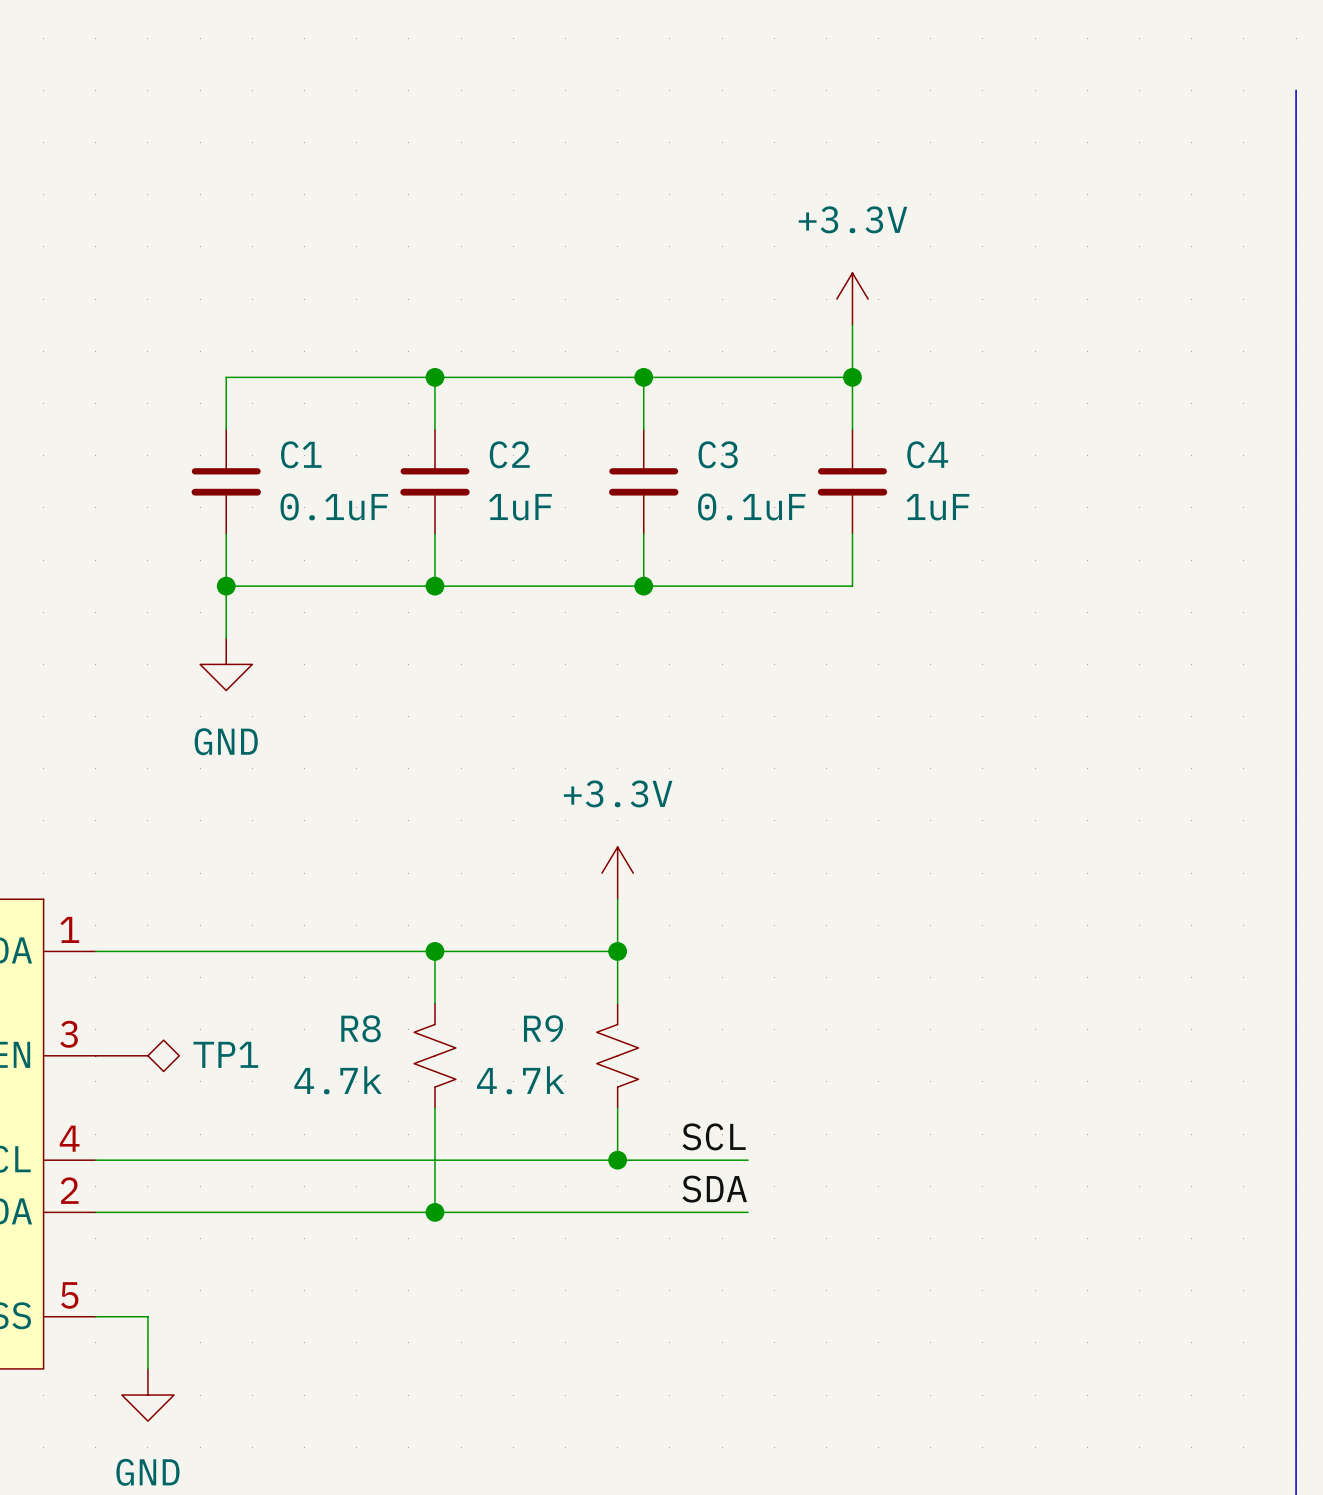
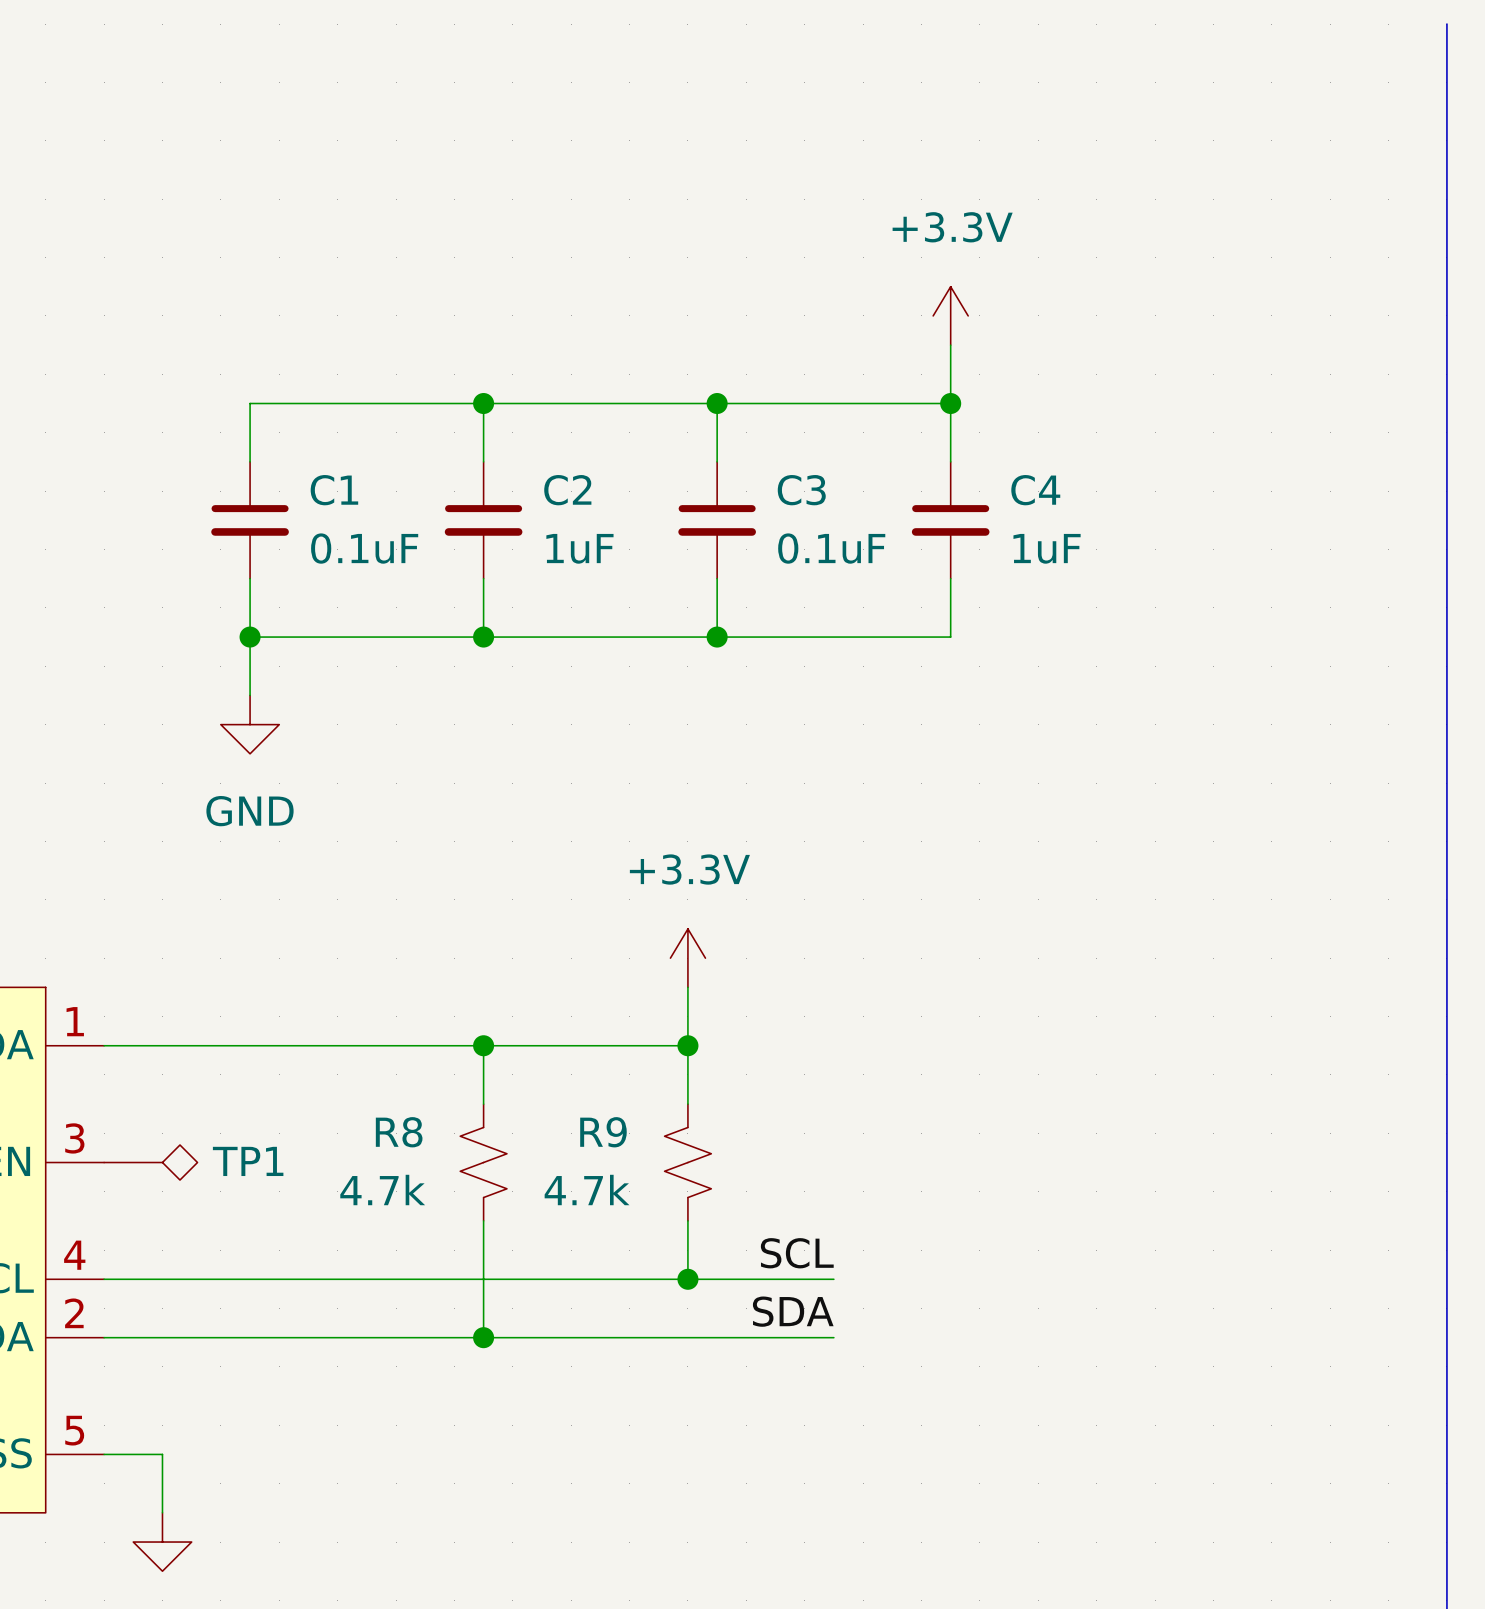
line: none -> (1446, 24) (1446, 82)

